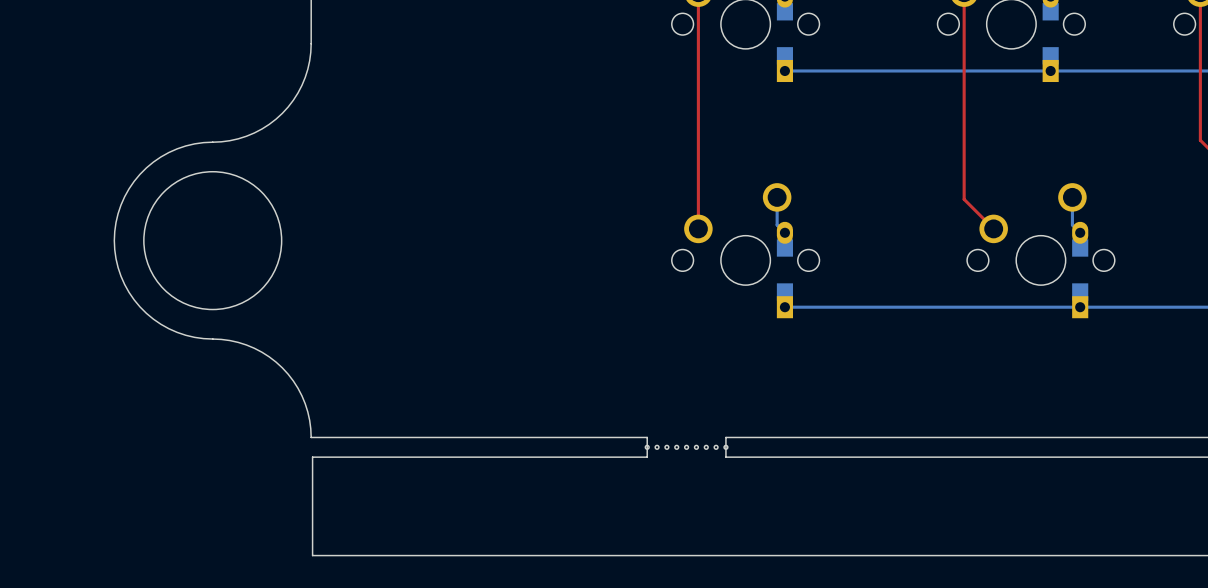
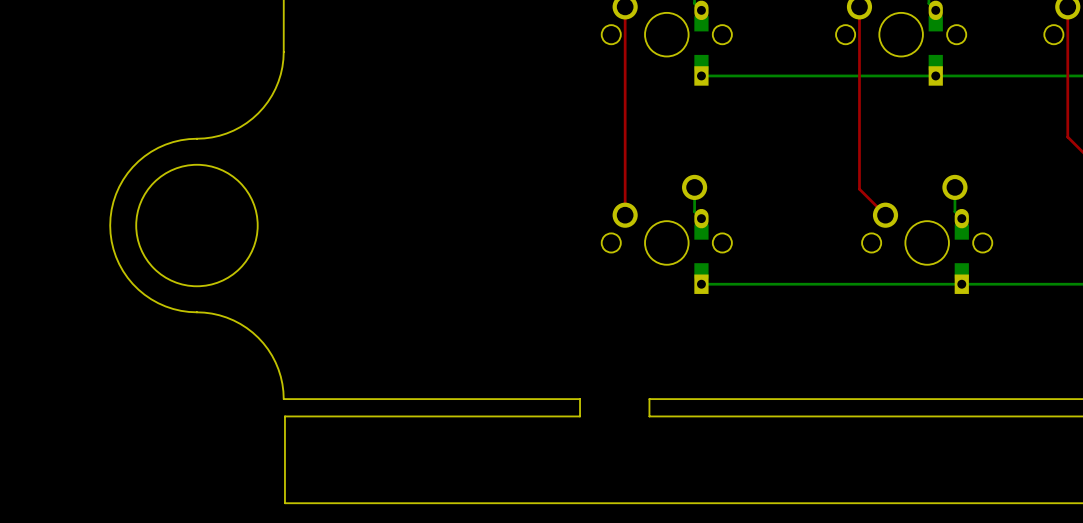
part: (647, 447) -> none
part: (657, 447) -> none
part: (666, 447) -> none
part: (676, 447) -> none
part: (686, 447) -> none
part: (696, 447) -> none
part: (706, 447) -> none
part: (716, 447) -> none
part: (725, 447) -> none

